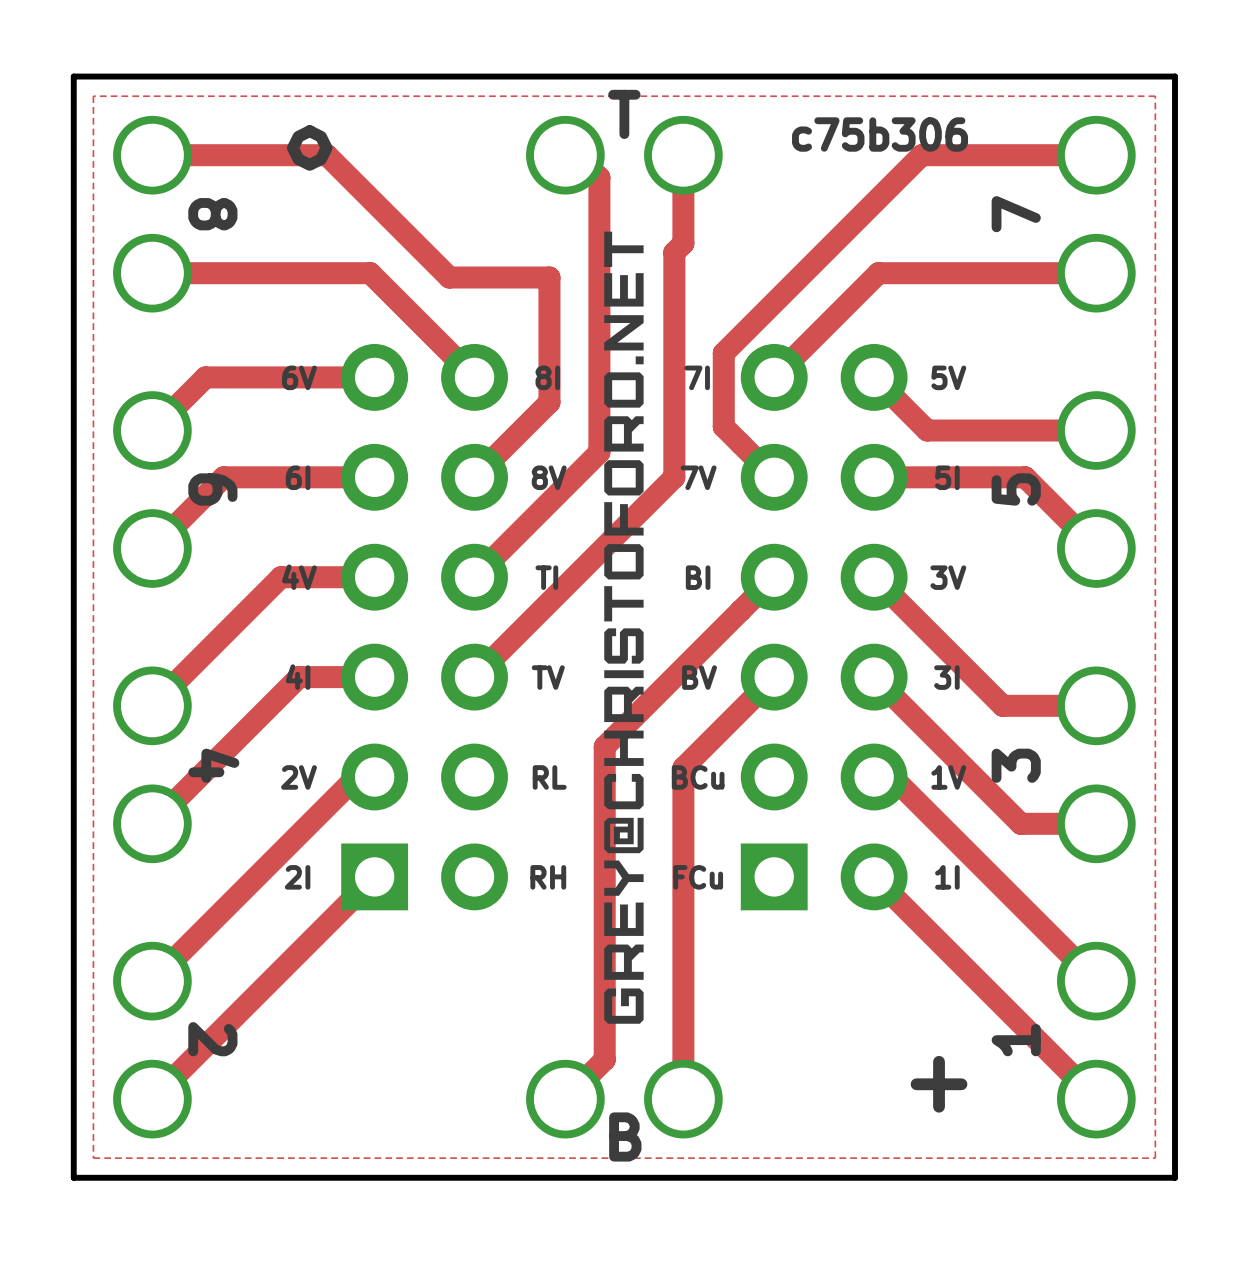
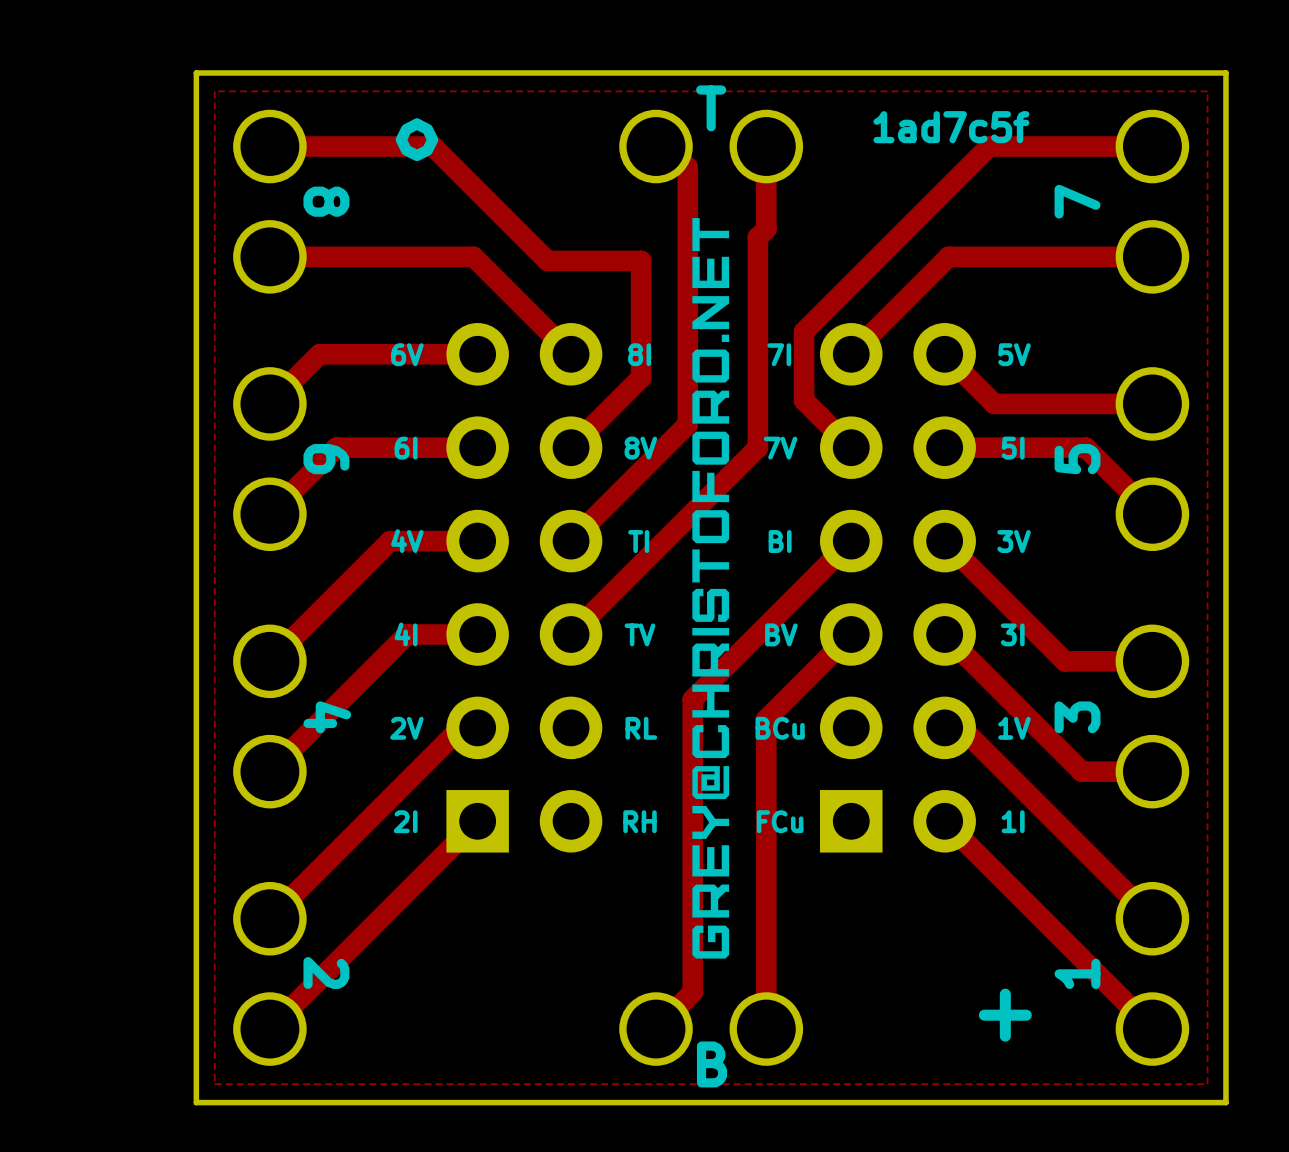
text: c75b306 (880, 134) -> 1ad7c5f (951, 127)

